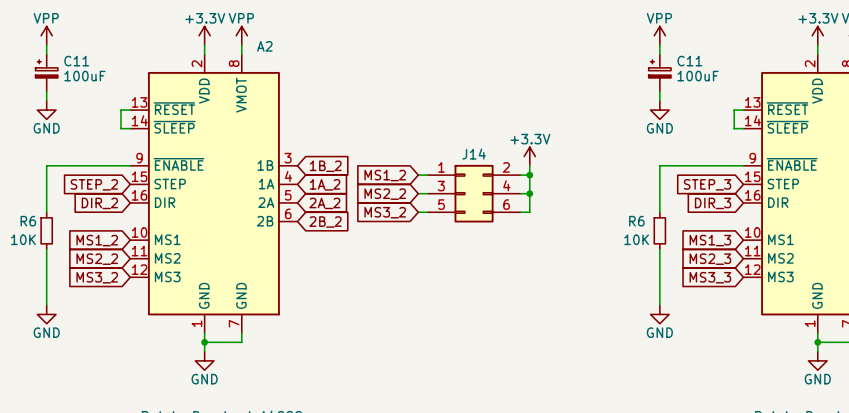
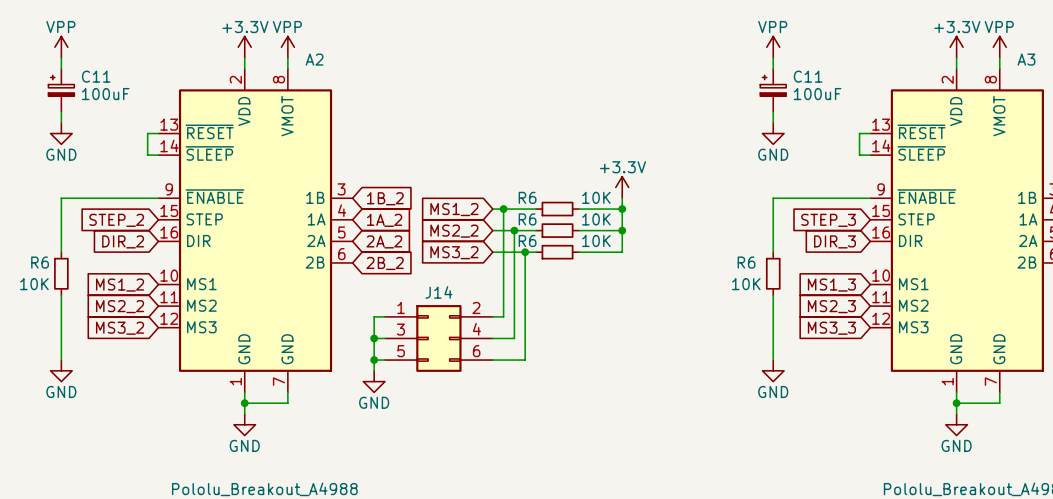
junction: none -> (503, 209)
wire: none -> (535, 209) (503, 209) (503, 316) (492, 316)
R6: none -> 10K (557, 209)
wire: none -> (514, 230) (514, 338) (492, 338)
junction: none -> (514, 230)
J14 position: (474, 193) -> (438, 338)
R6: none -> 10K (557, 230)
wire: none -> (525, 252) (525, 360) (492, 360)
junction: none -> (525, 252)
R6: none -> 10K (557, 252)
wire: none -> (384, 316) (374, 316) (374, 370)
wire: none -> (374, 338) (384, 338)
junction: none -> (374, 338)
wire: none -> (374, 360) (384, 360)
junction: none -> (374, 360)
power symbol: none -> GND (374, 381)

